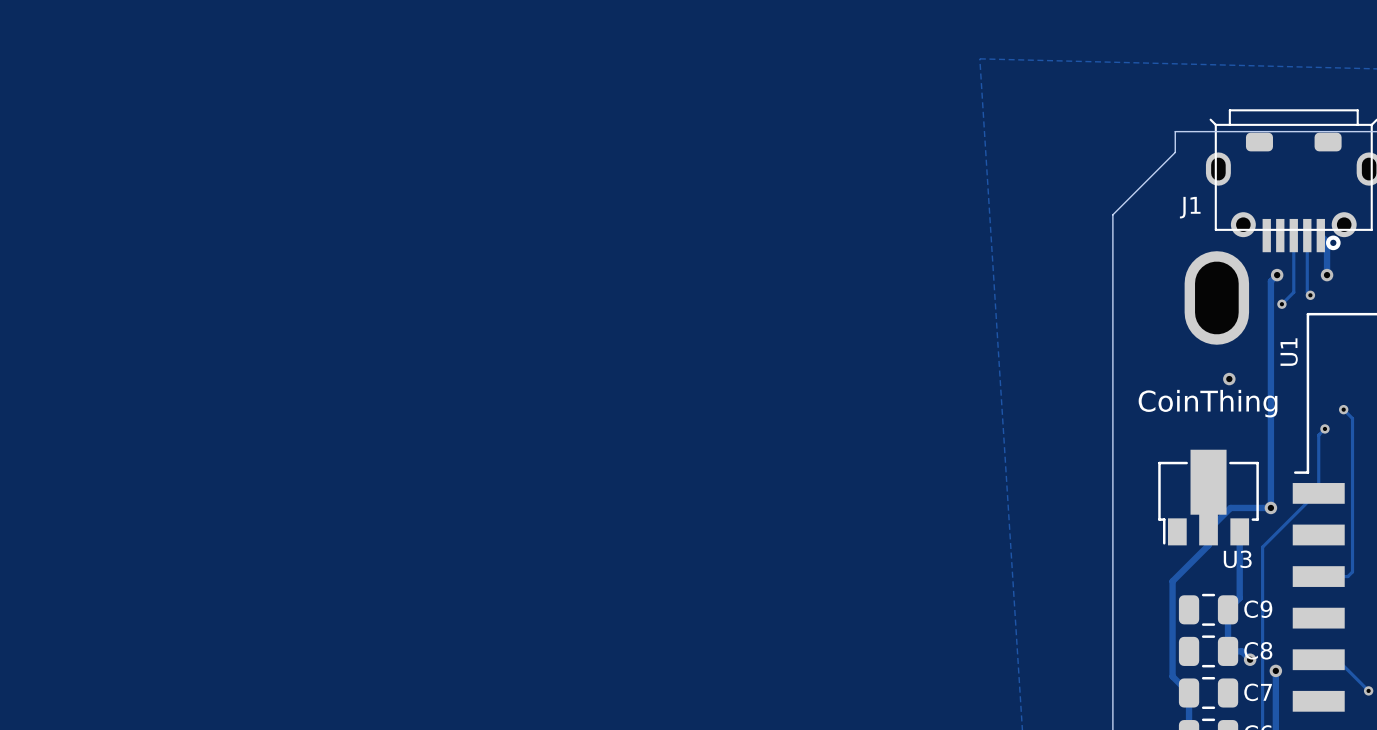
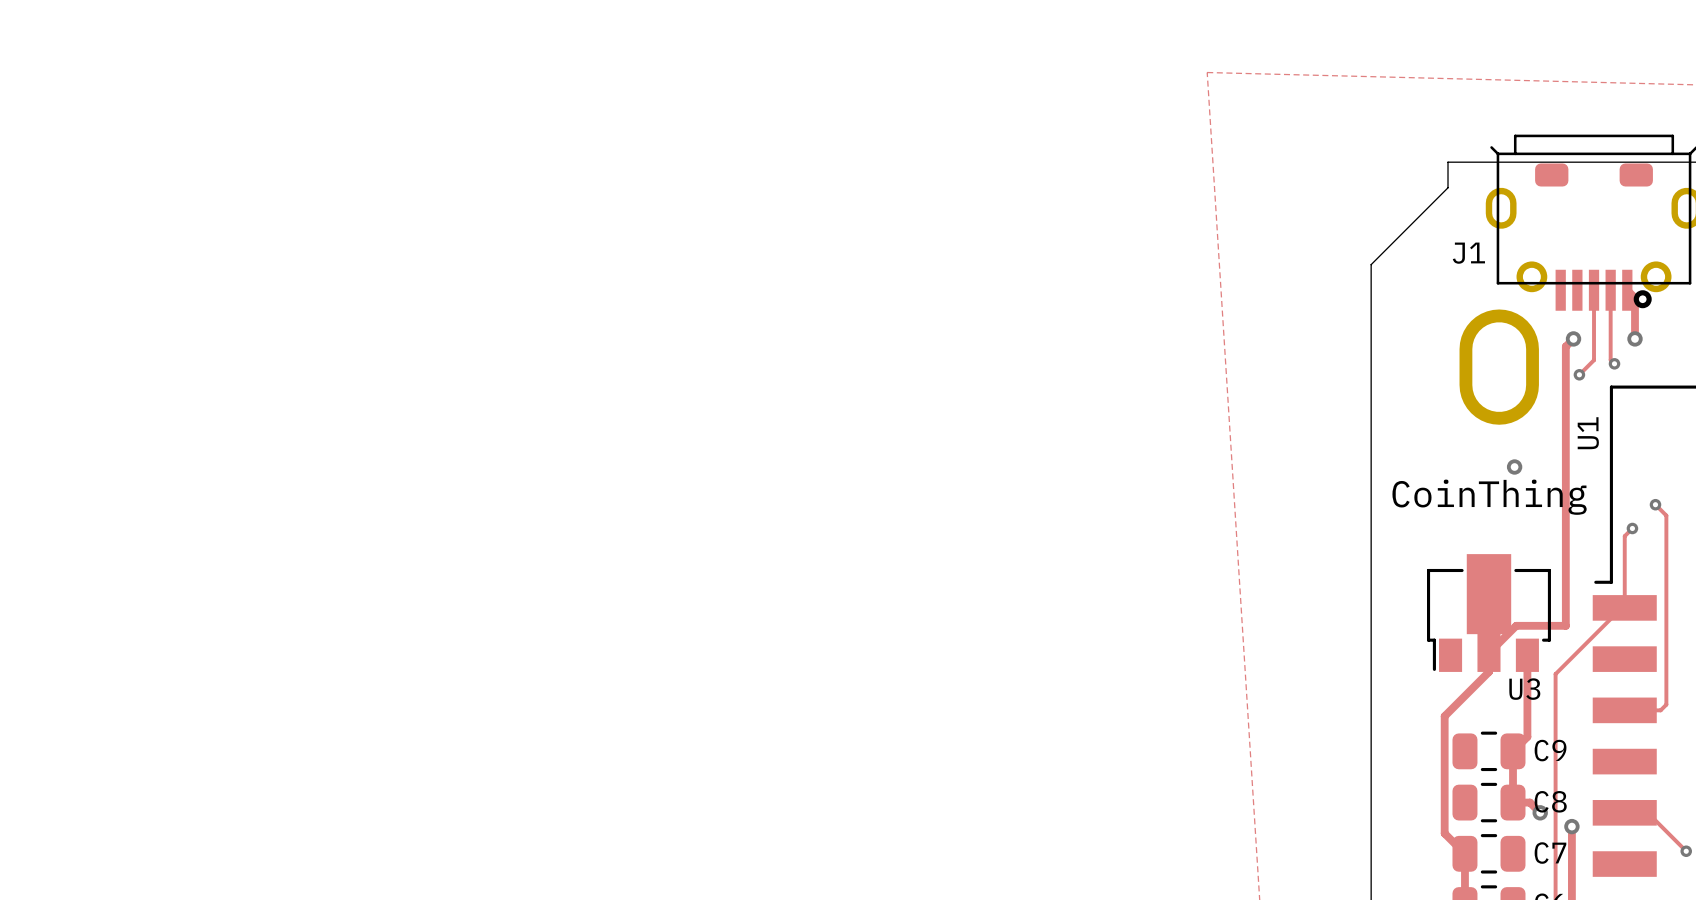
via: (1270, 507) -> none

